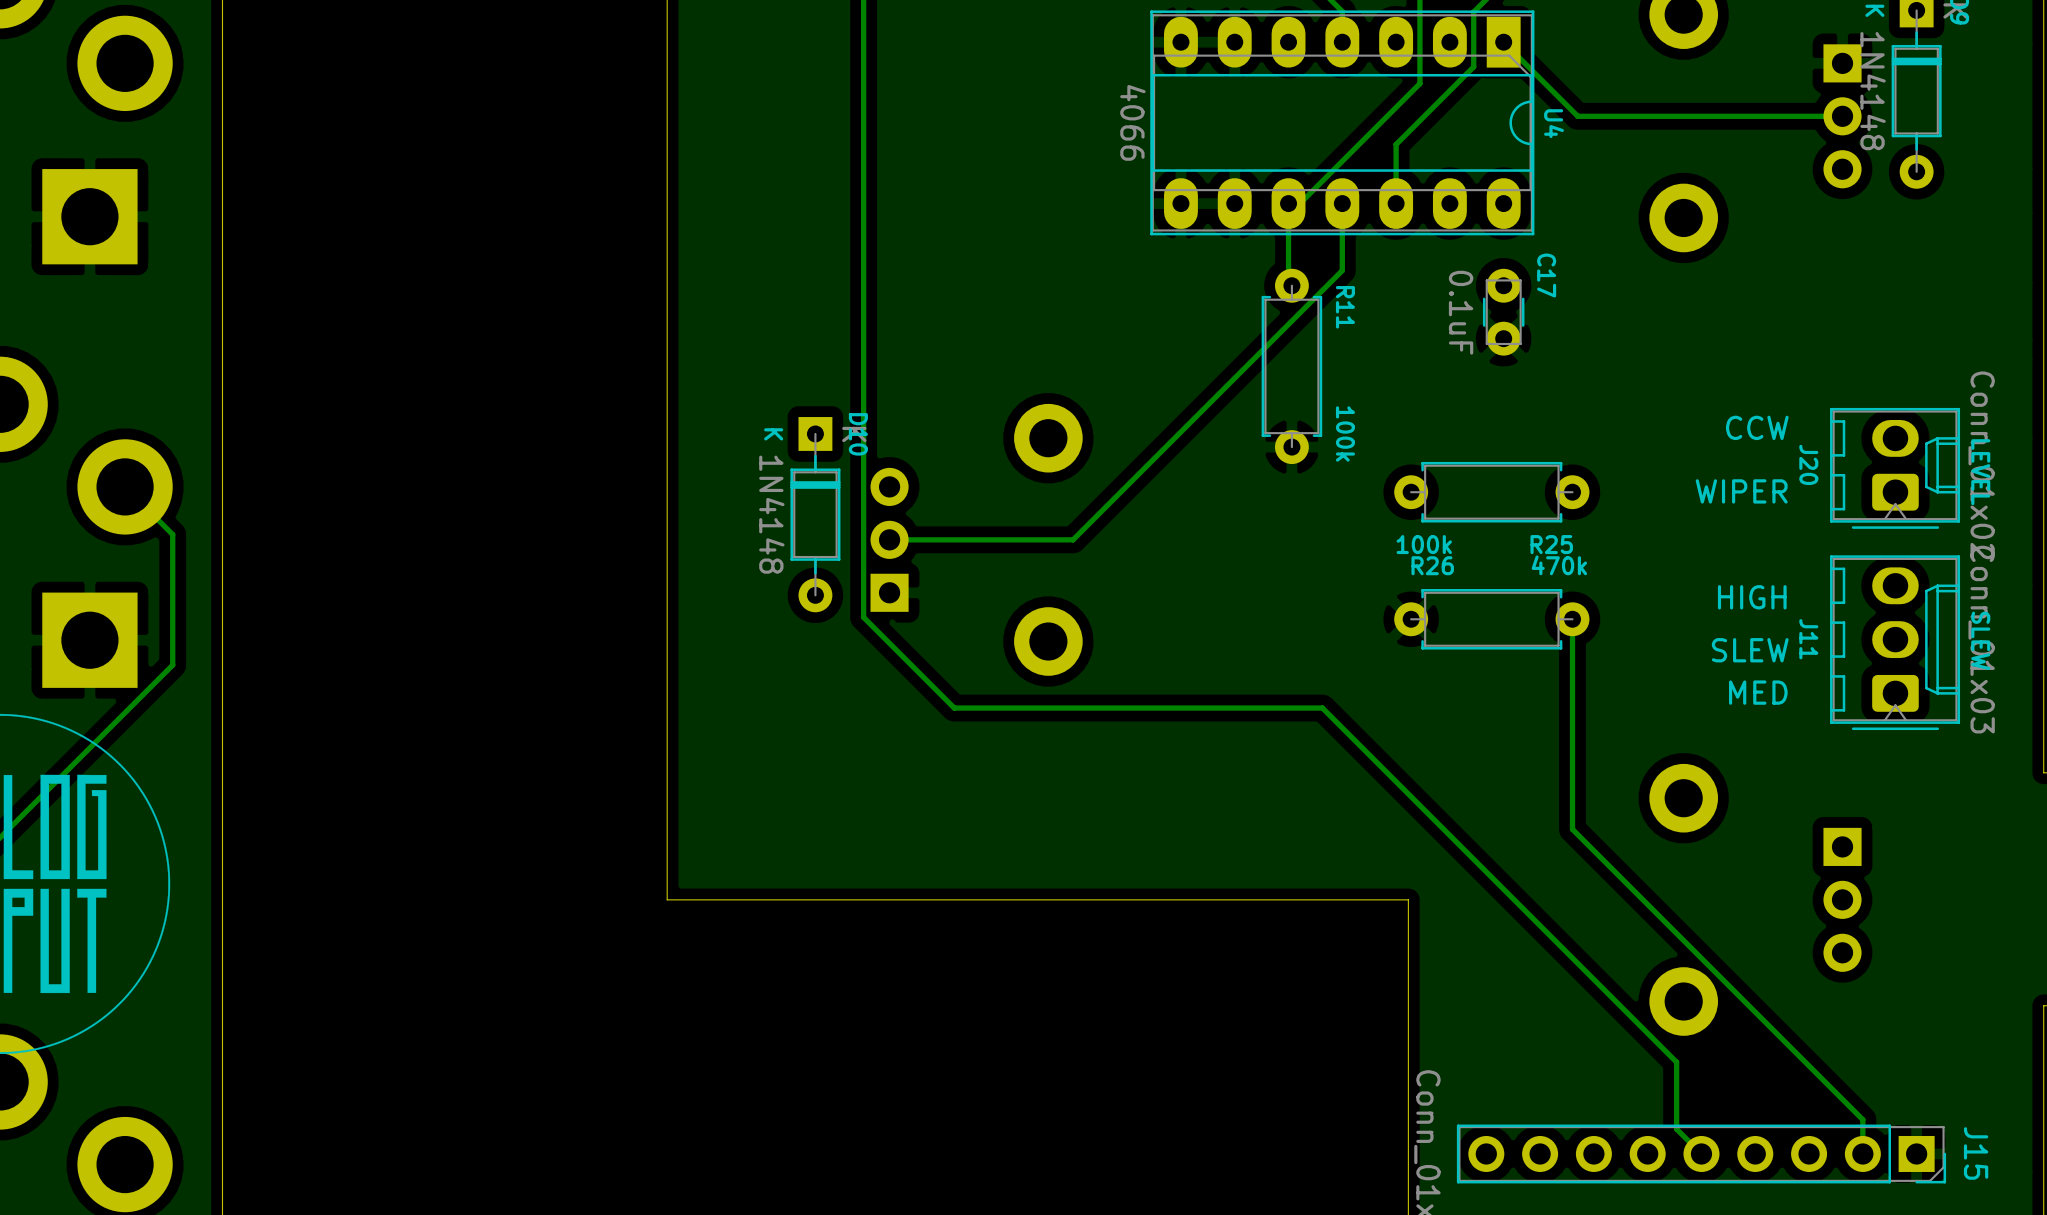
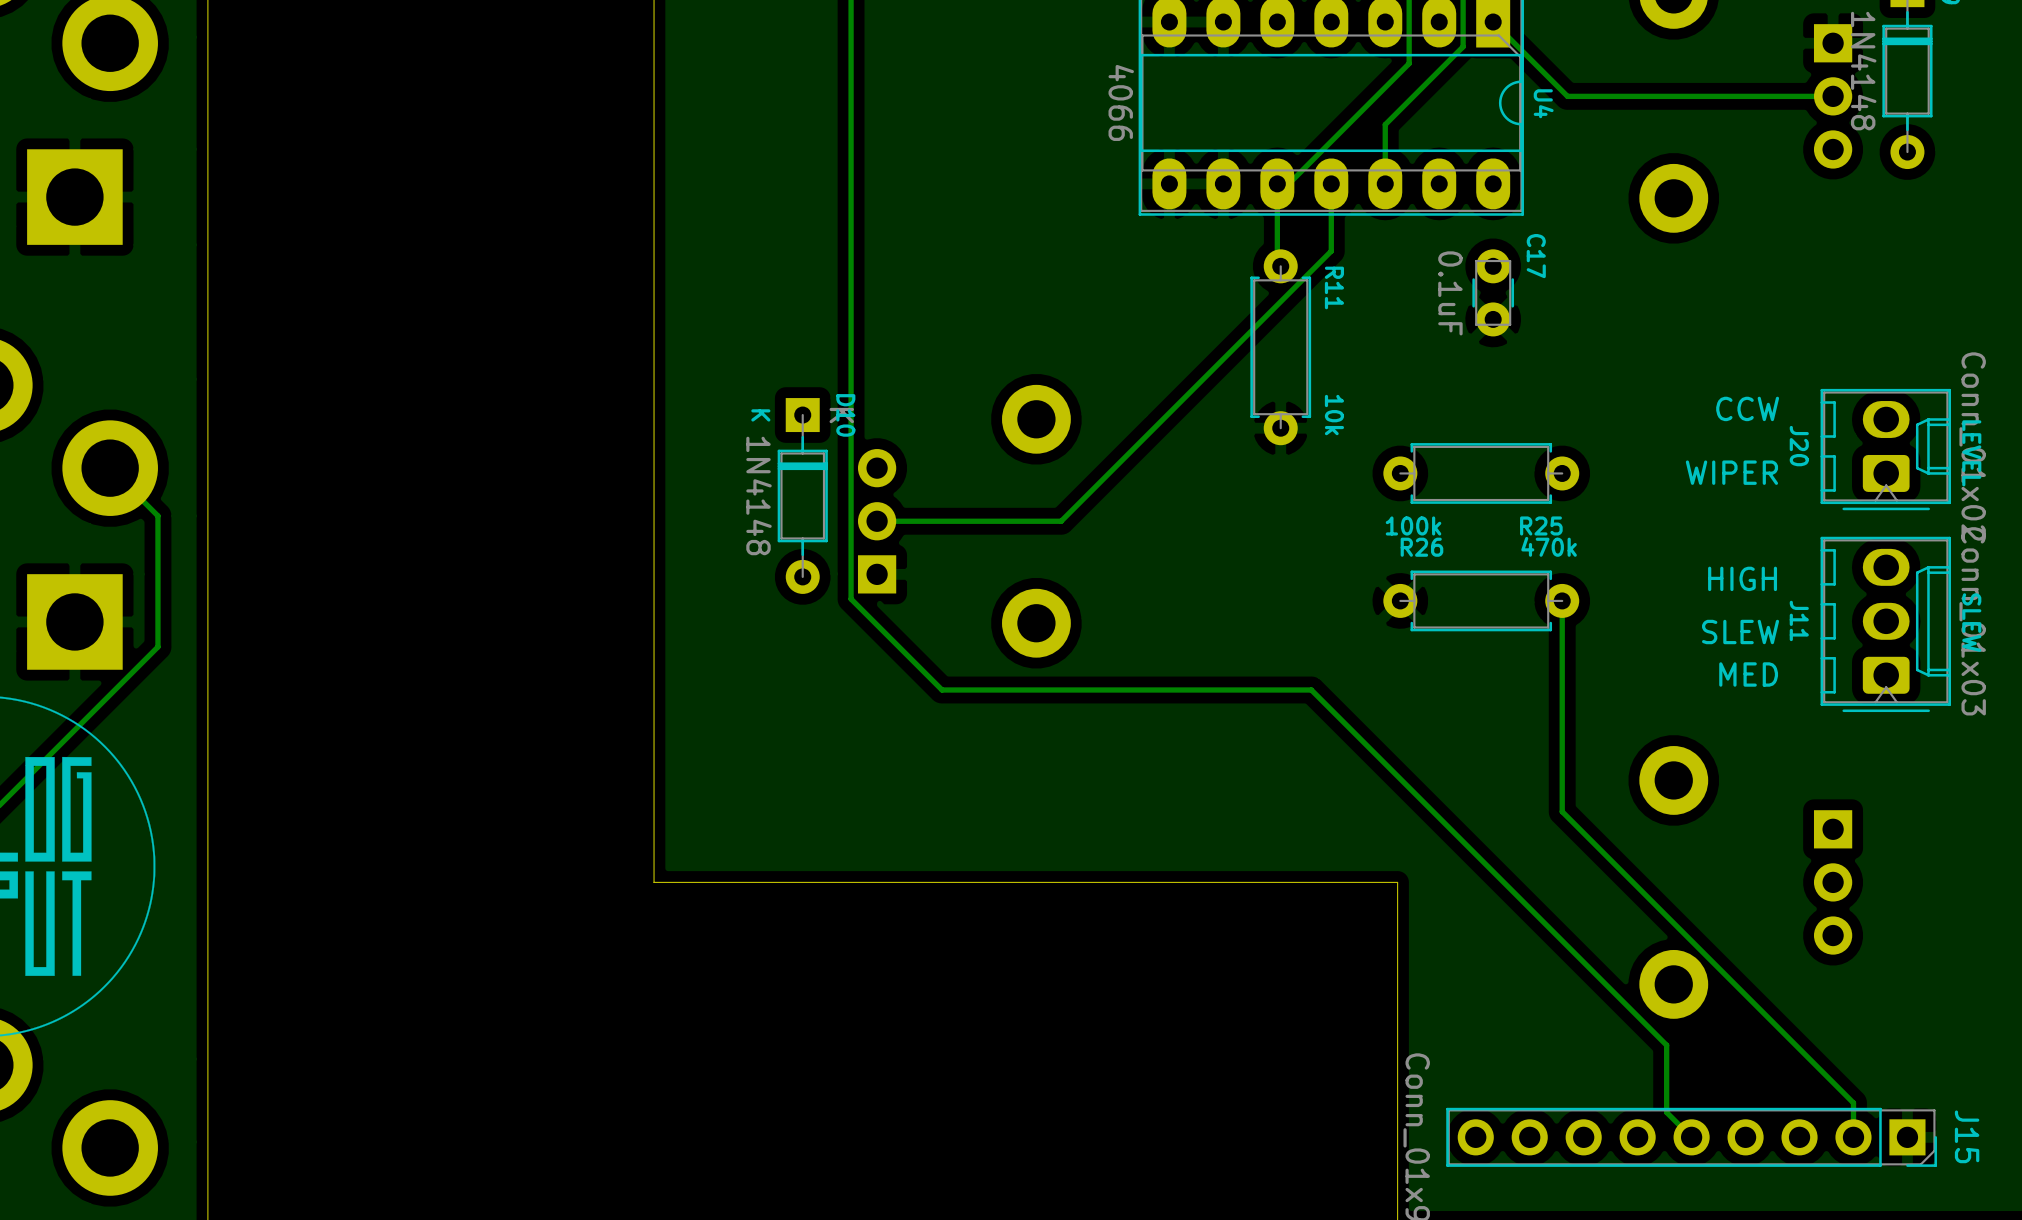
R11 value: 100k (1345, 433) -> 10k (1334, 415)

